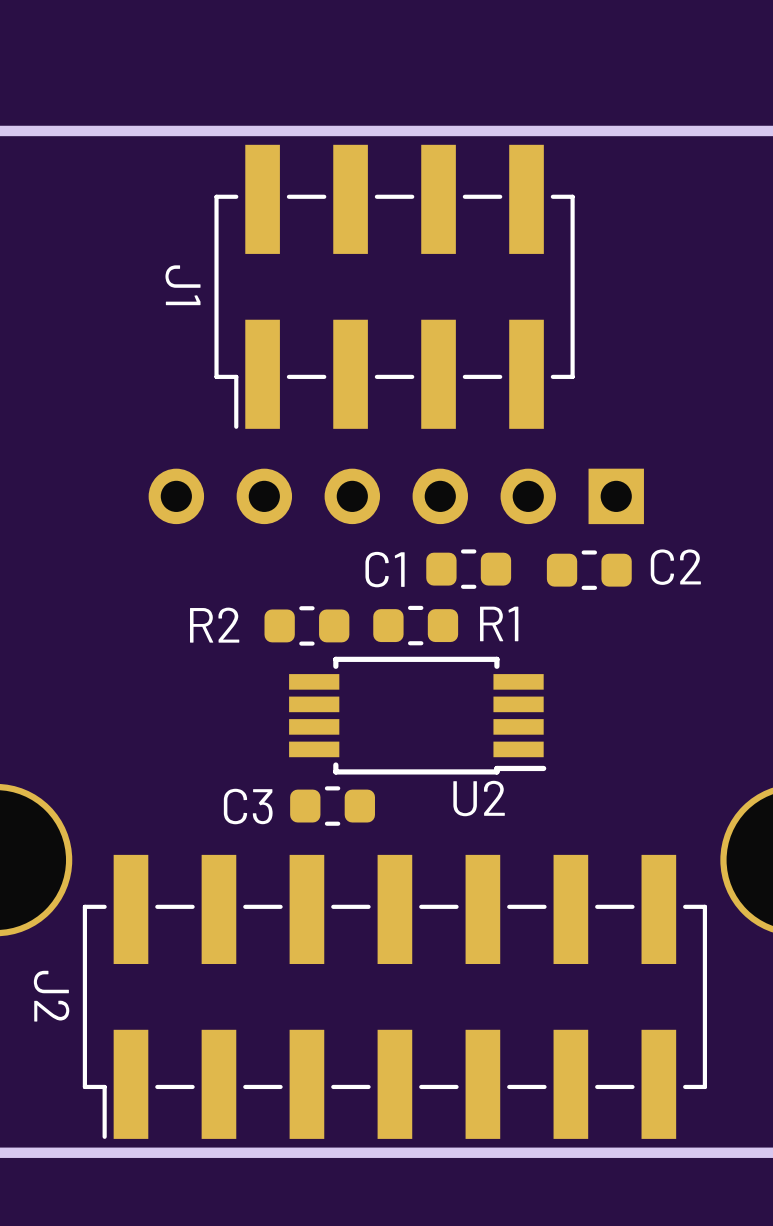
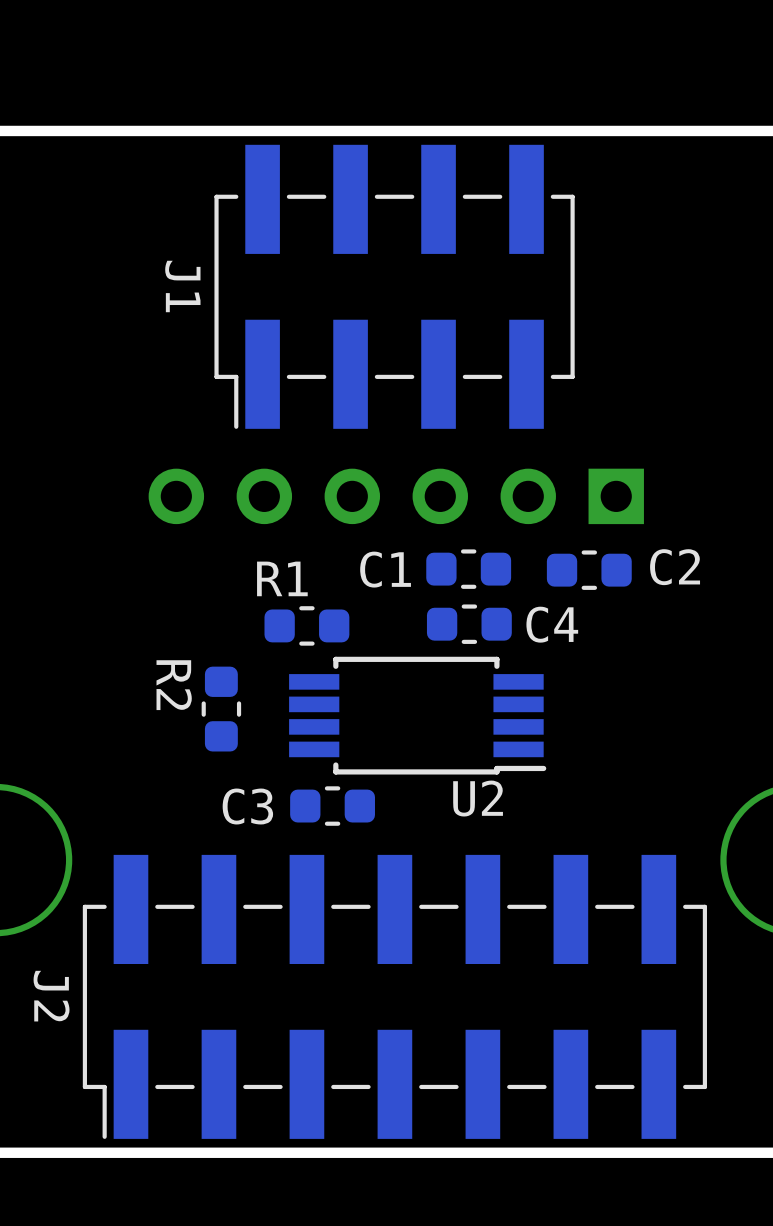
C4: none -> (469, 624)
R2 name: R2 (214, 625) -> R1 (282, 578)
R1: (415, 625) -> none
R2: none -> (221, 709)

